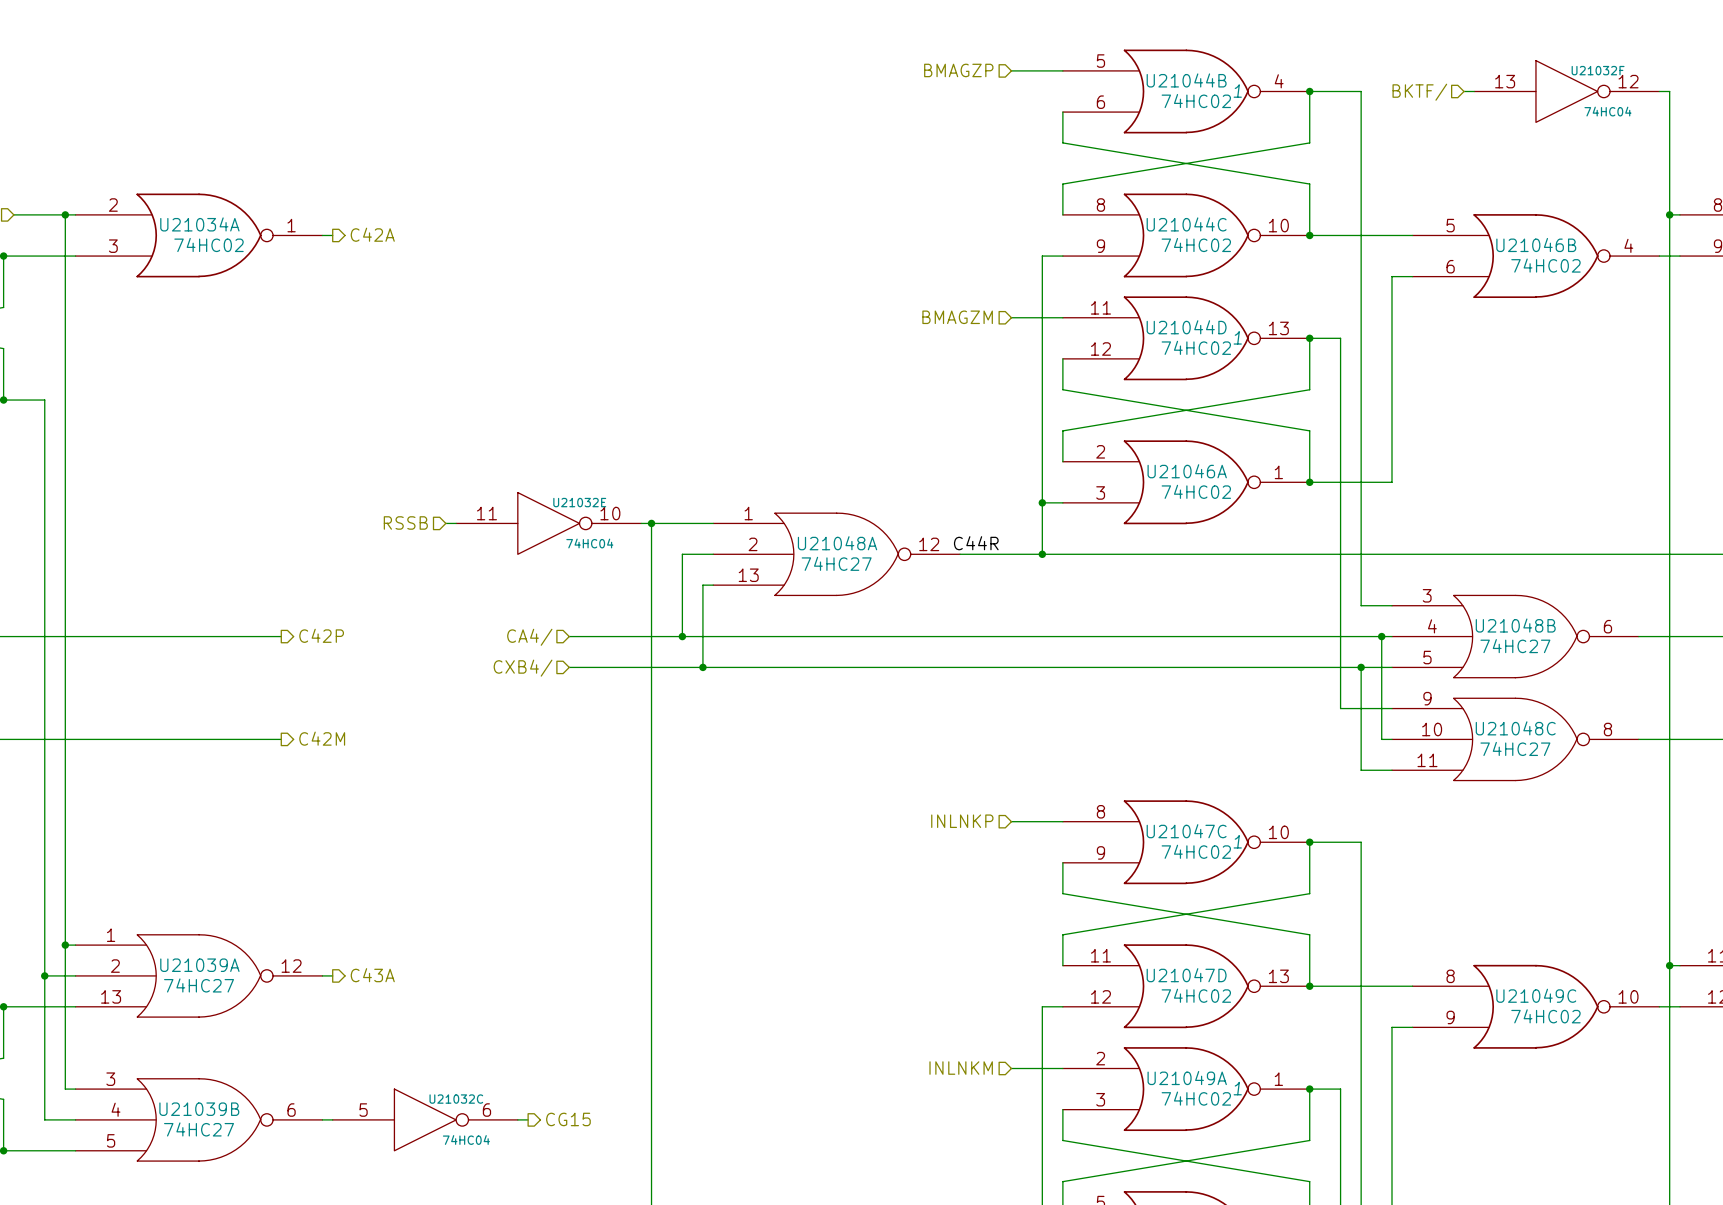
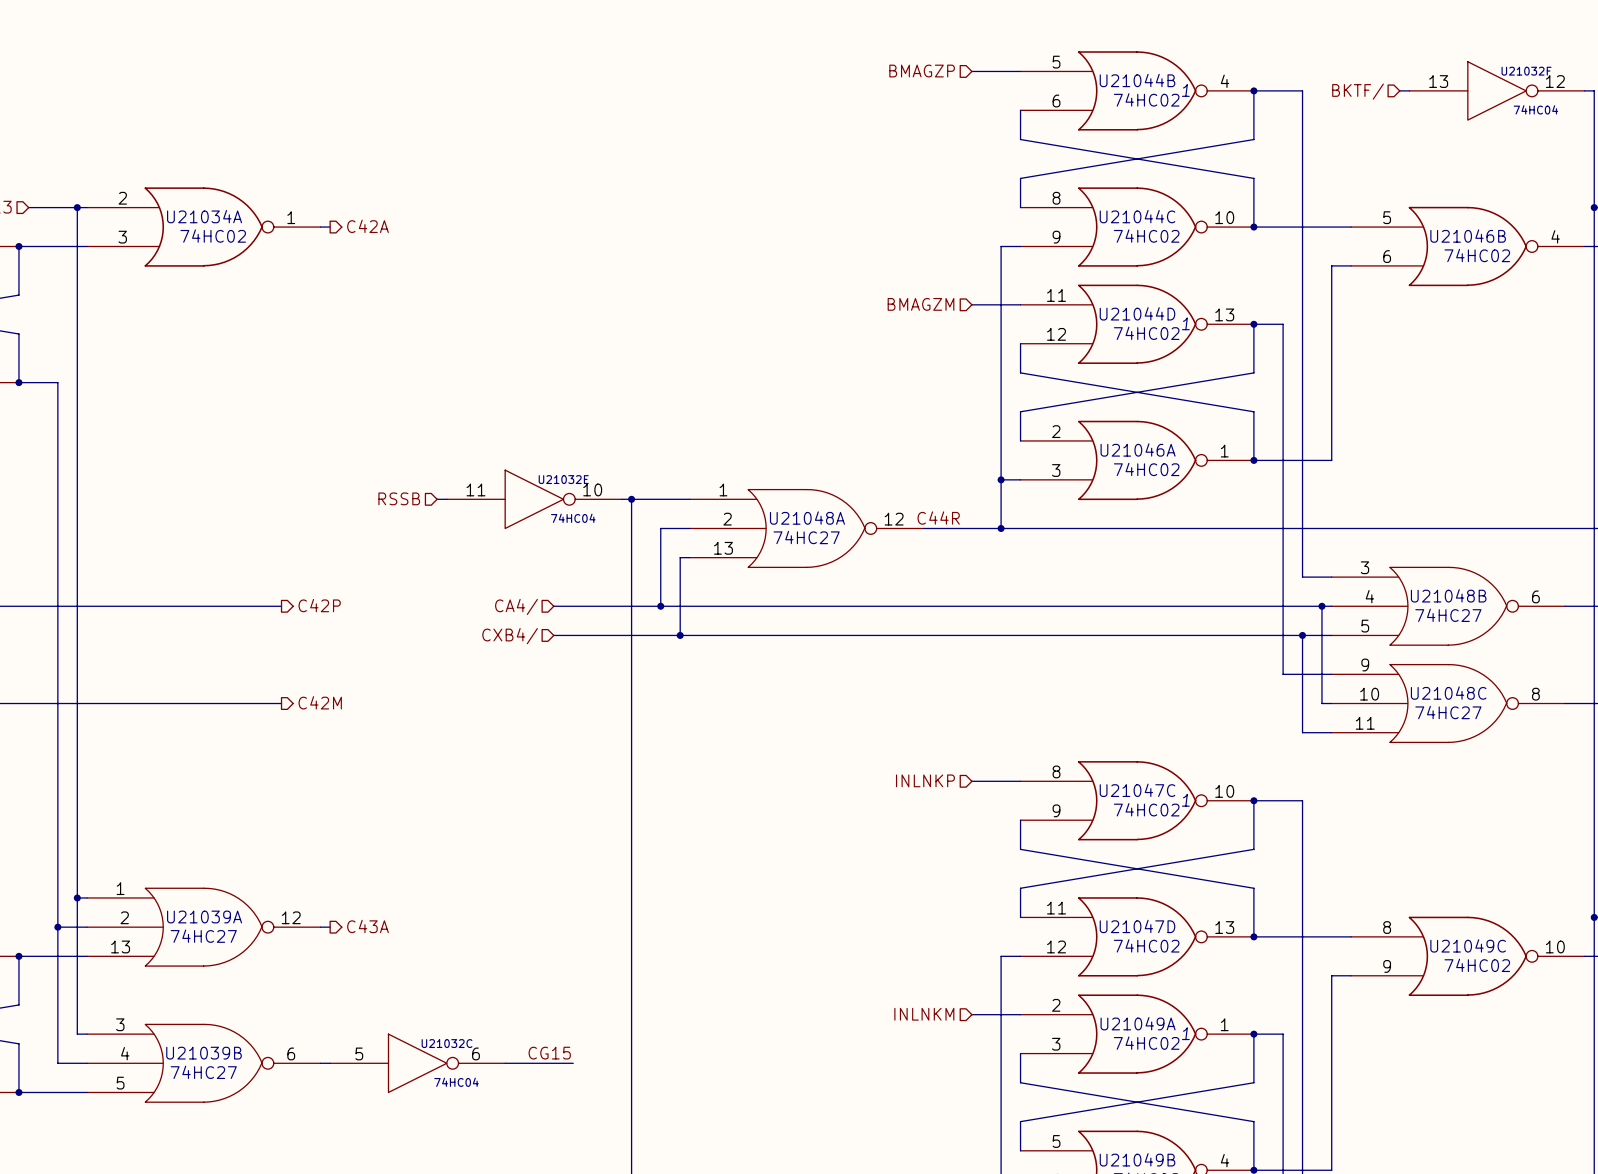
label: none -> CG15 (549, 1053)
wire: none -> (514, 1063) (573, 1063)
hierarchical label: CG15 (568, 1119) -> none

